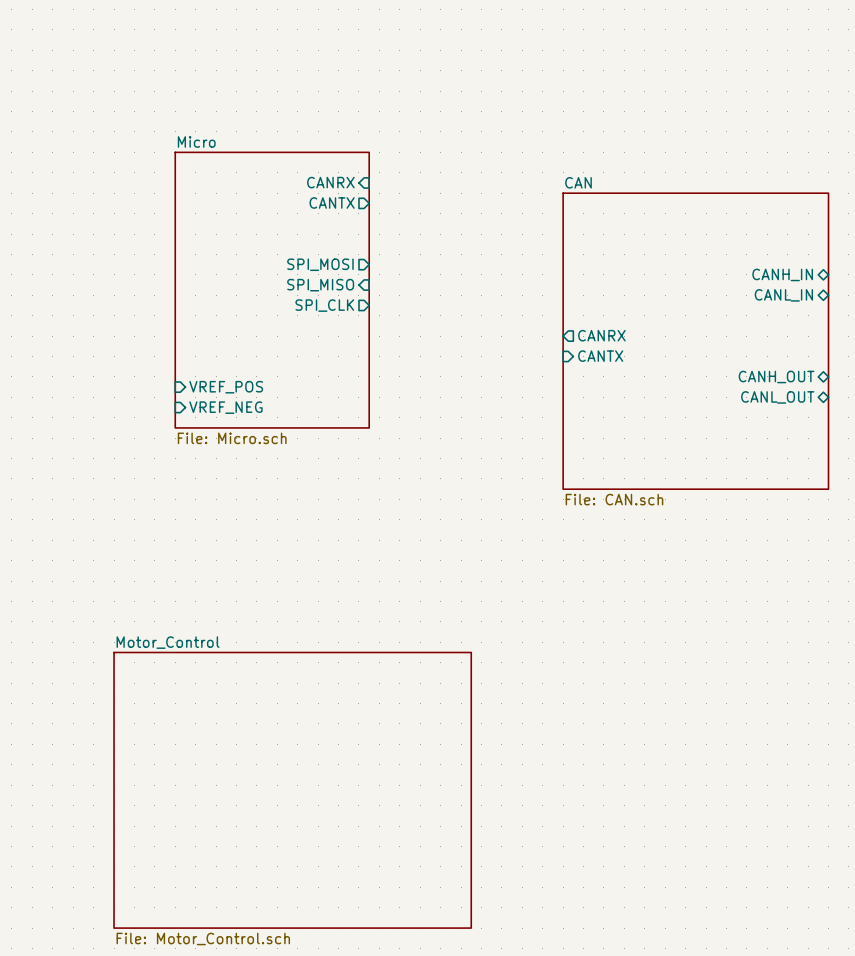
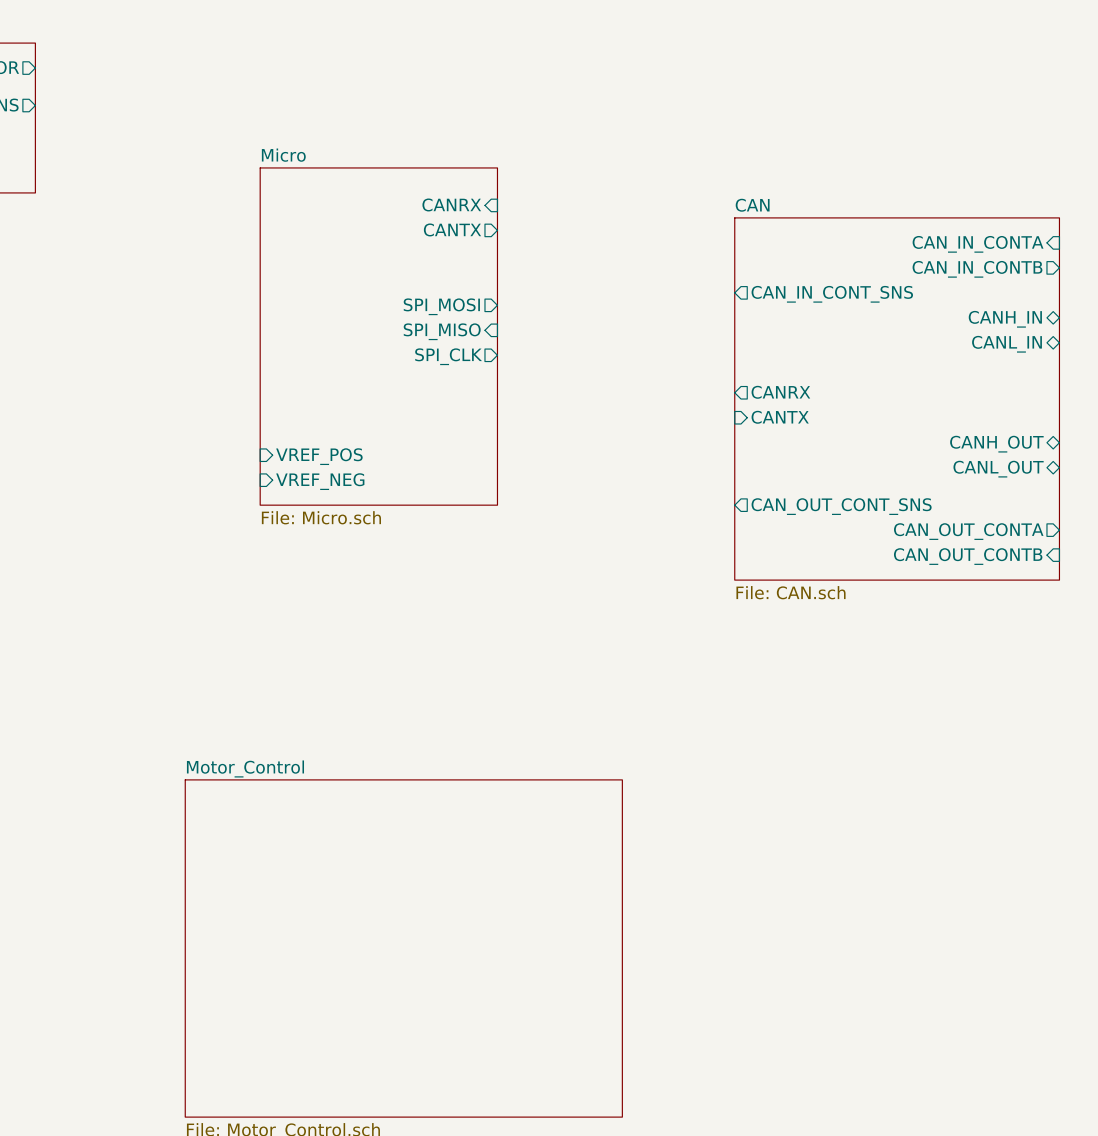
sheet pin: none -> CAN_IN_CONTA (978, 244)
sheet pin: none -> CAN_IN_CONTB (977, 269)
sheet pin: none -> CAN_IN_CONT_SNS (832, 294)
sheet pin: none -> CAN_OUT_CONT_SNS (841, 506)
sheet pin: none -> CAN_OUT_CONTA (968, 531)
sheet pin: none -> CAN_OUT_CONTB (968, 556)

